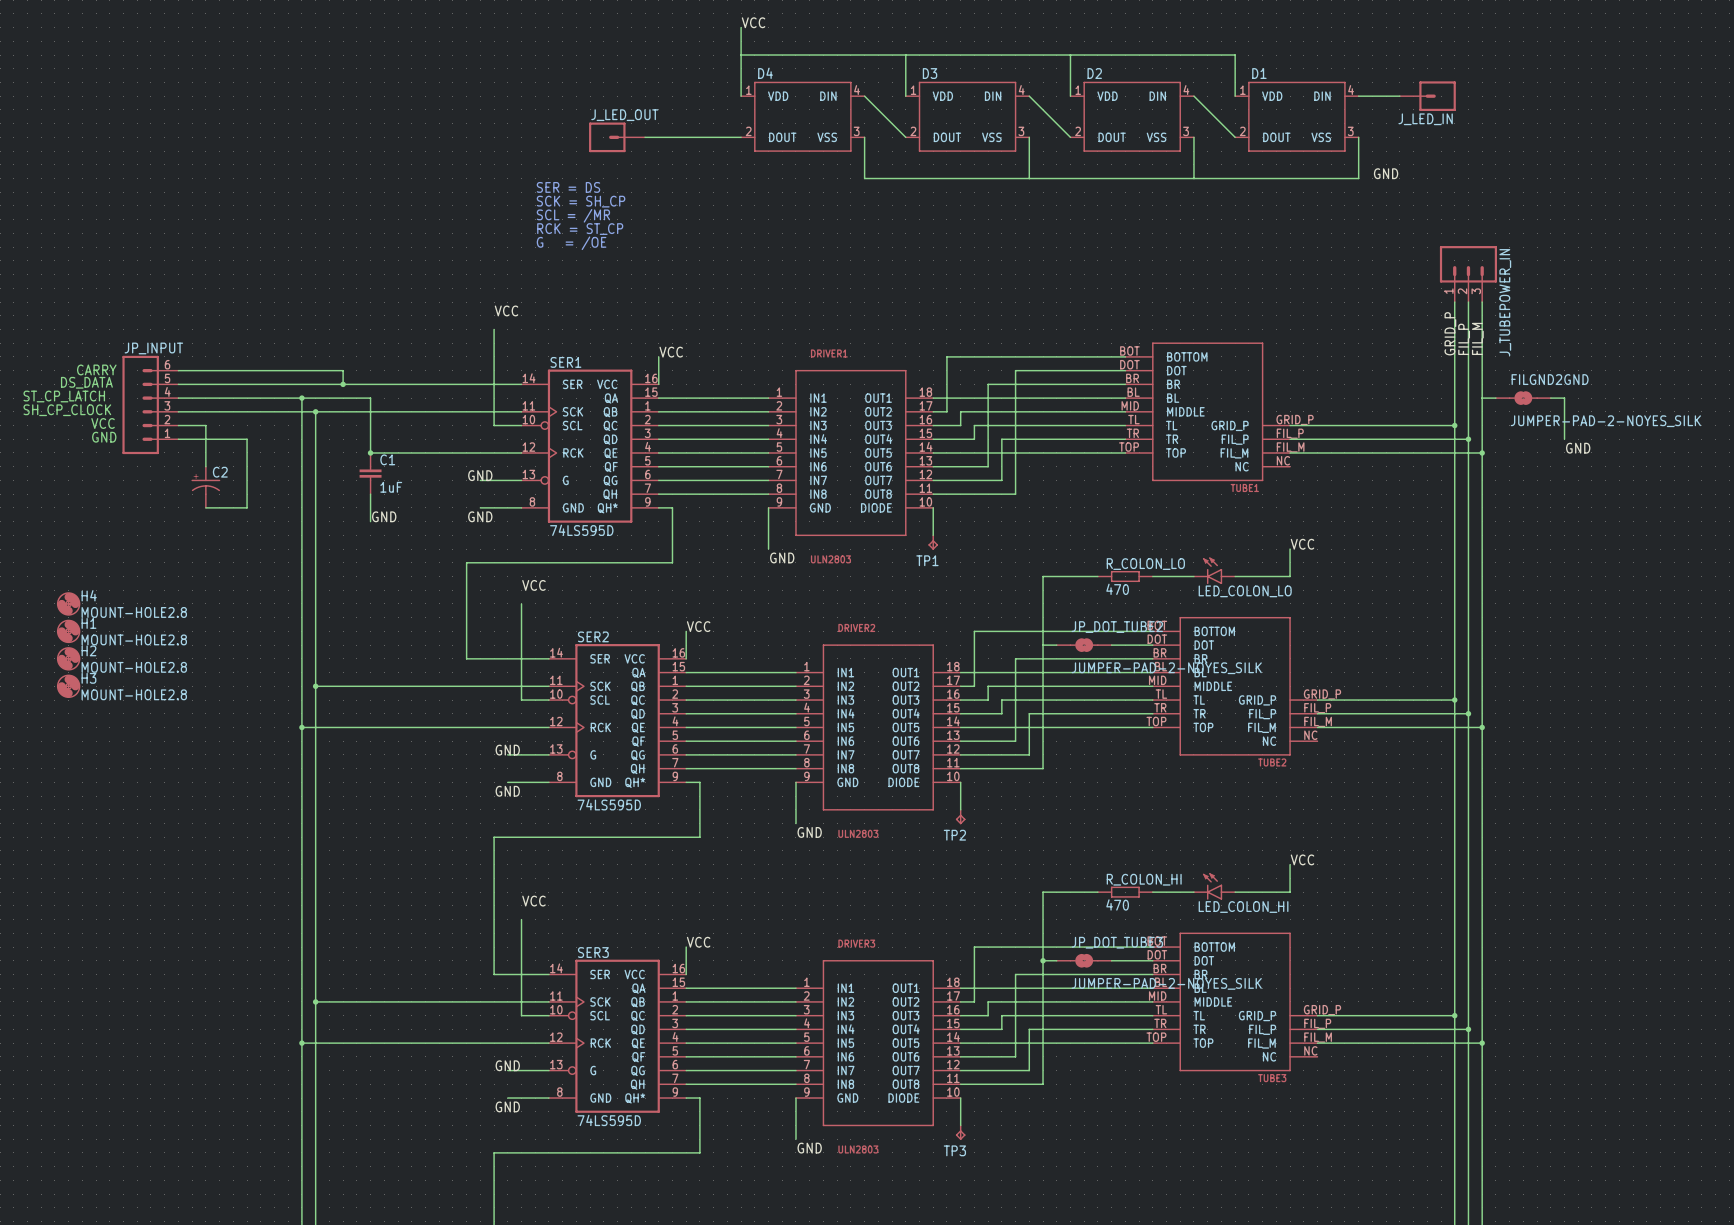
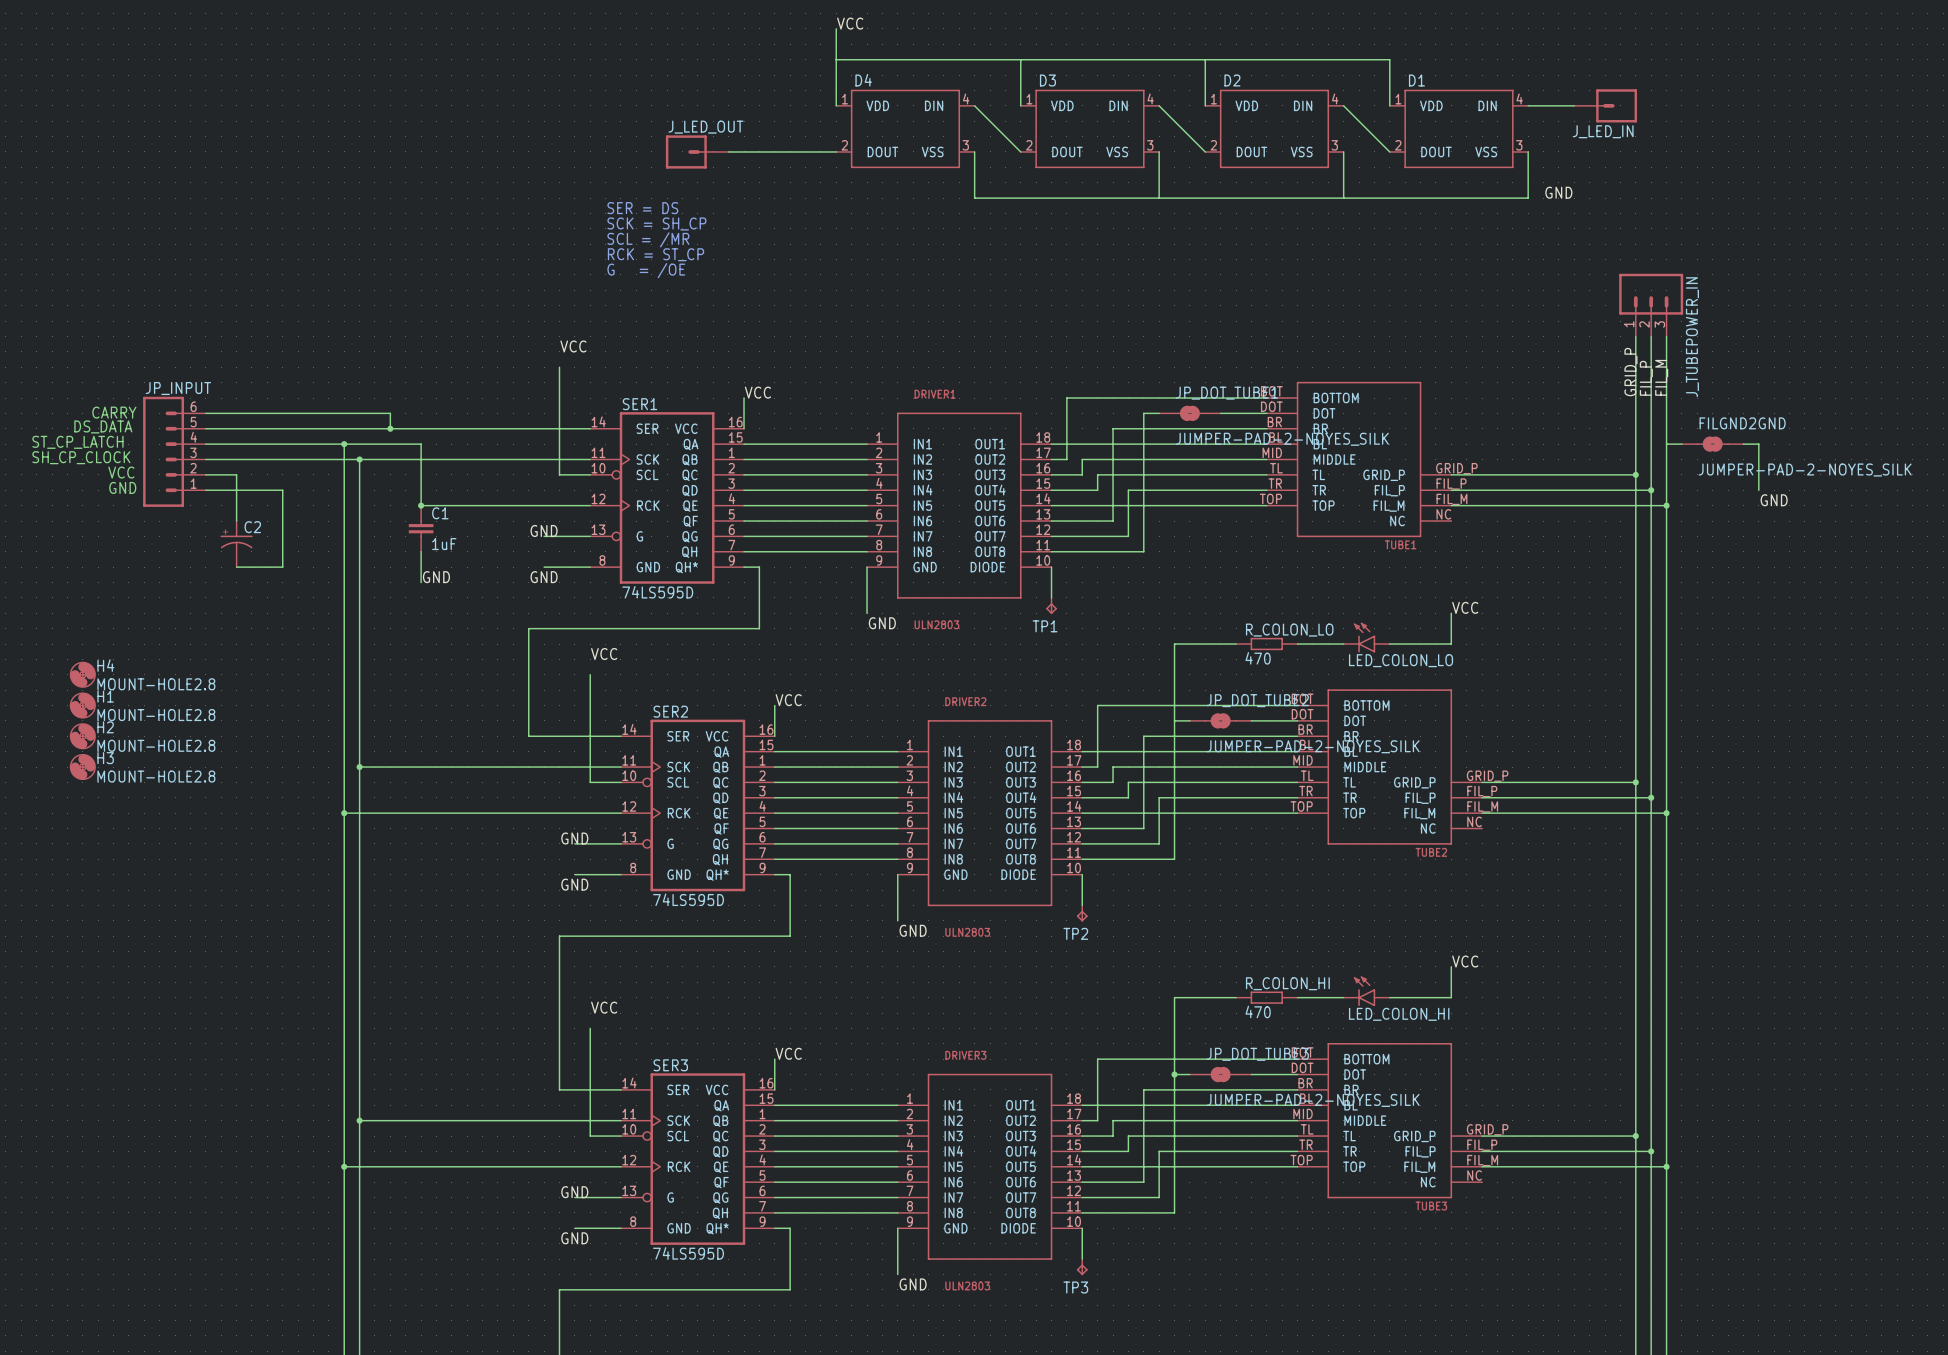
JP_DOT_TUBE1: none -> JUMPER-PAD-2-NOYES_SILK (1189, 413)

